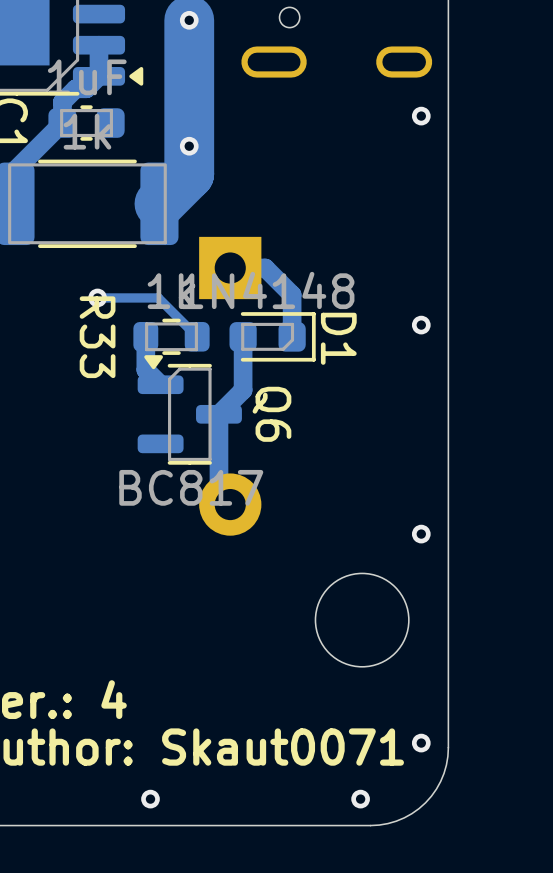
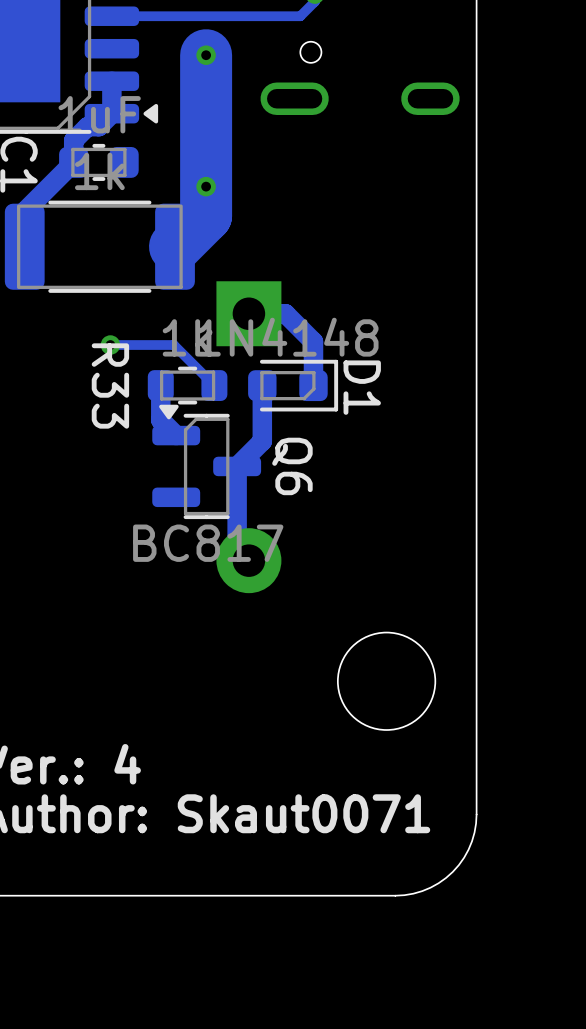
via: (421, 116) -> none
via: (421, 325) -> none
via: (421, 534) -> none
via: (421, 743) -> none
via: (150, 799) -> none
via: (360, 799) -> none

